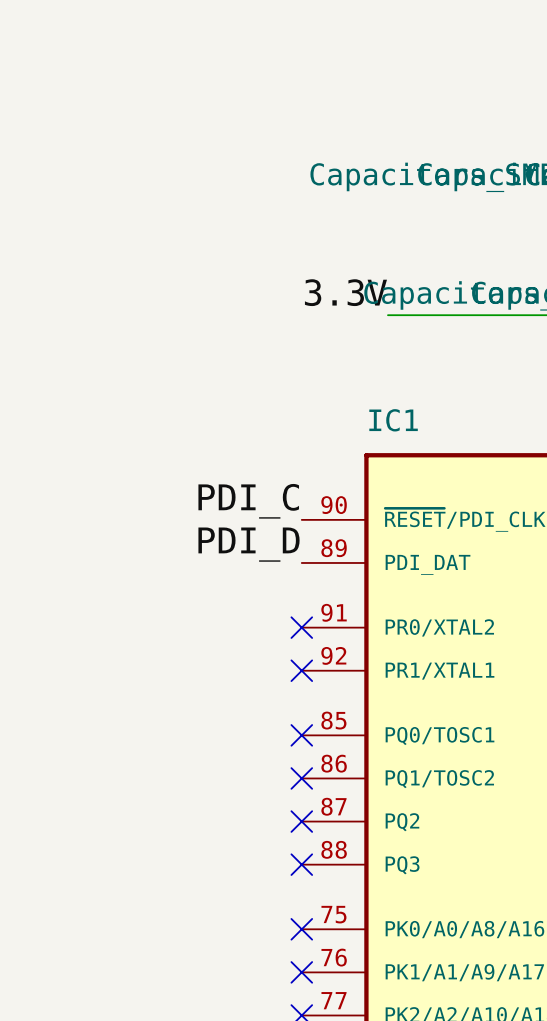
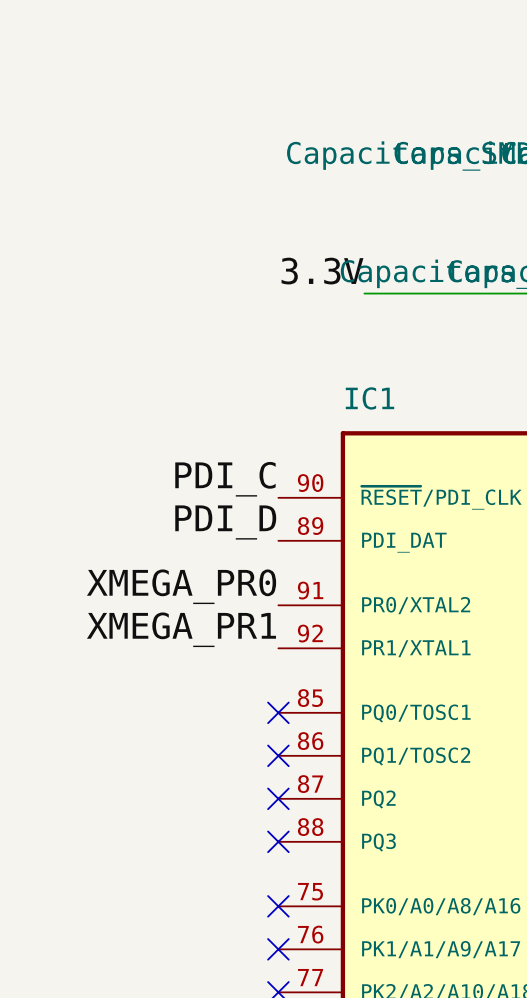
label: none -> XMEGA_PR0 (181, 586)
no-connect mark: (301, 627) -> none
label: none -> XMEGA_PR1 (181, 629)
no-connect mark: (301, 670) -> none

